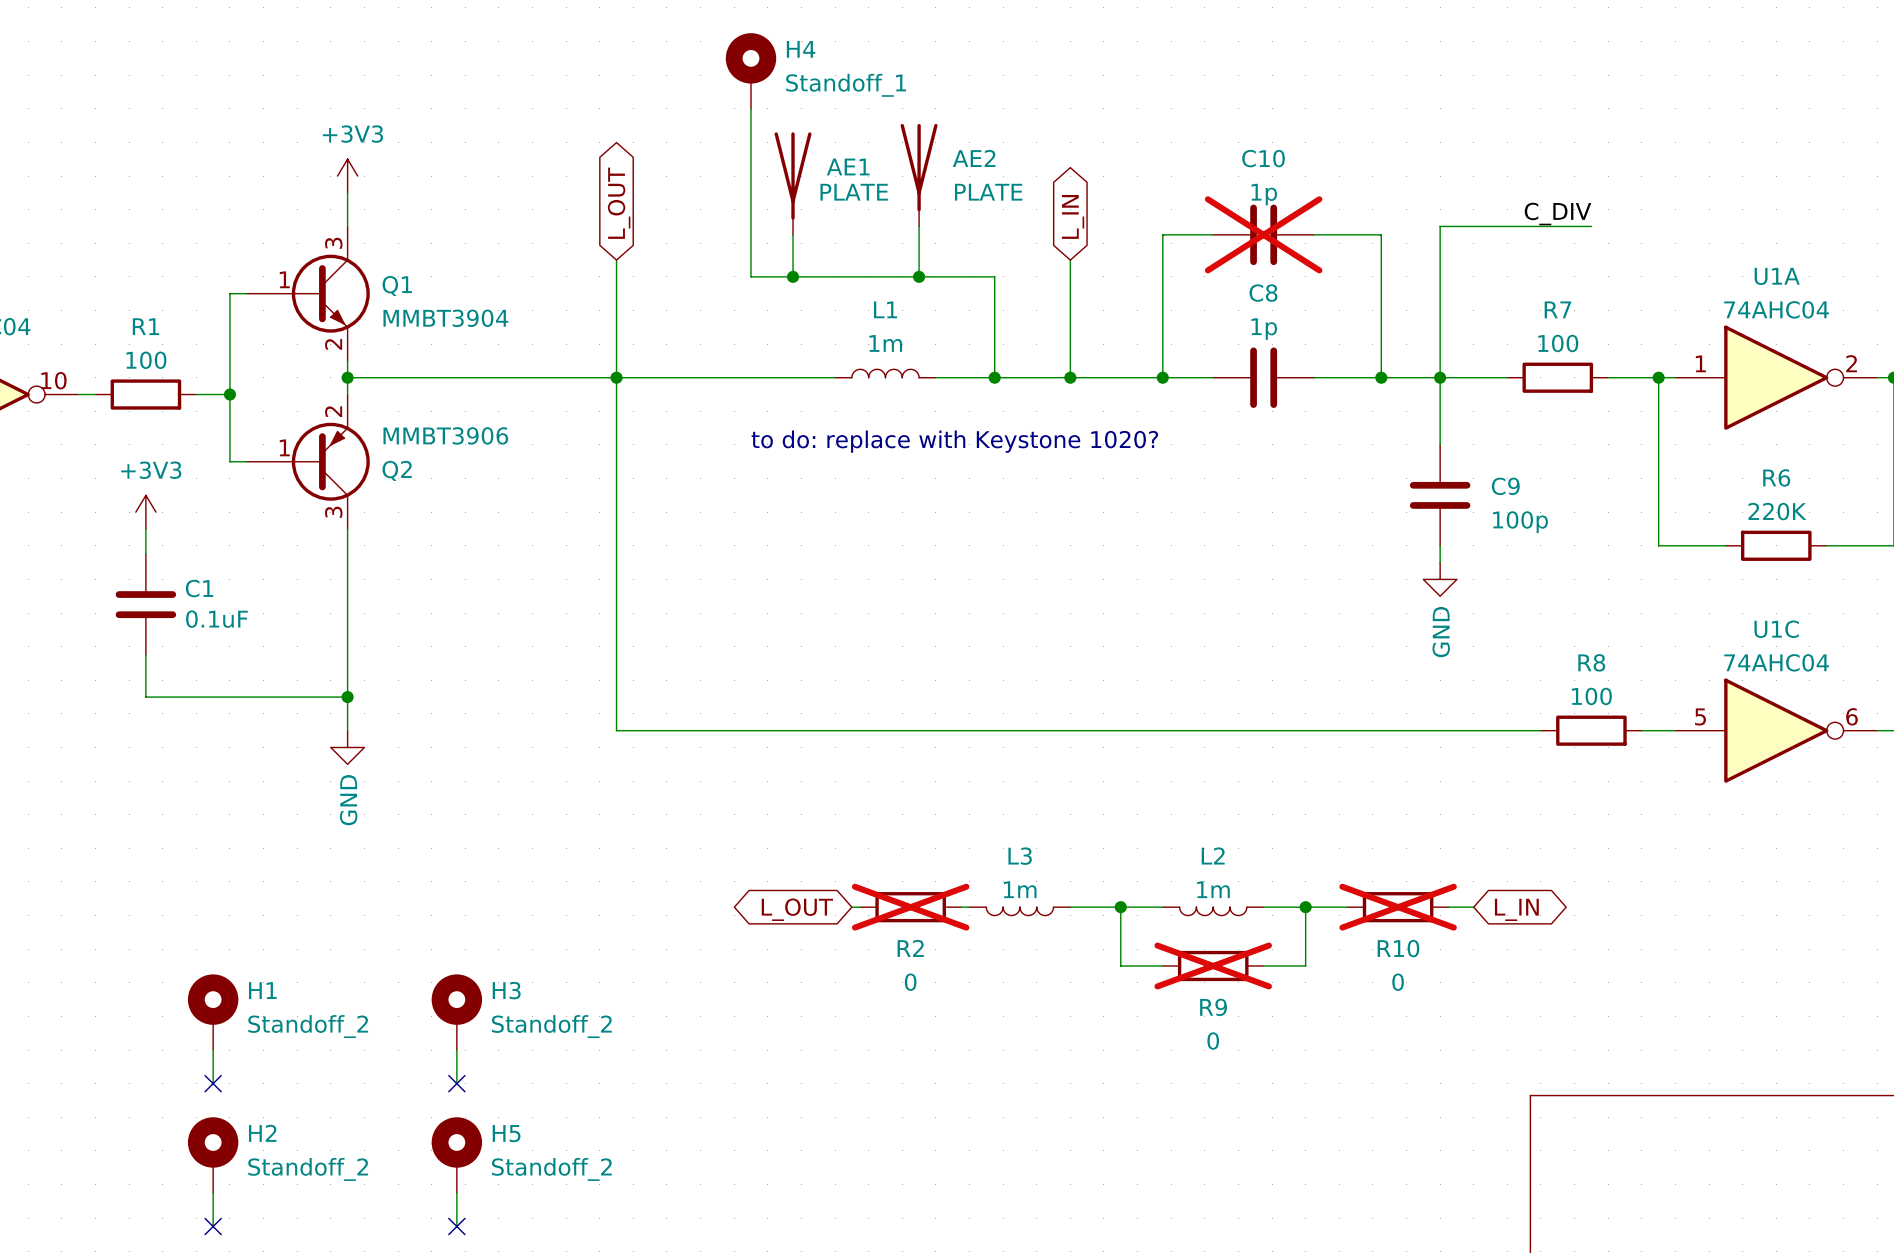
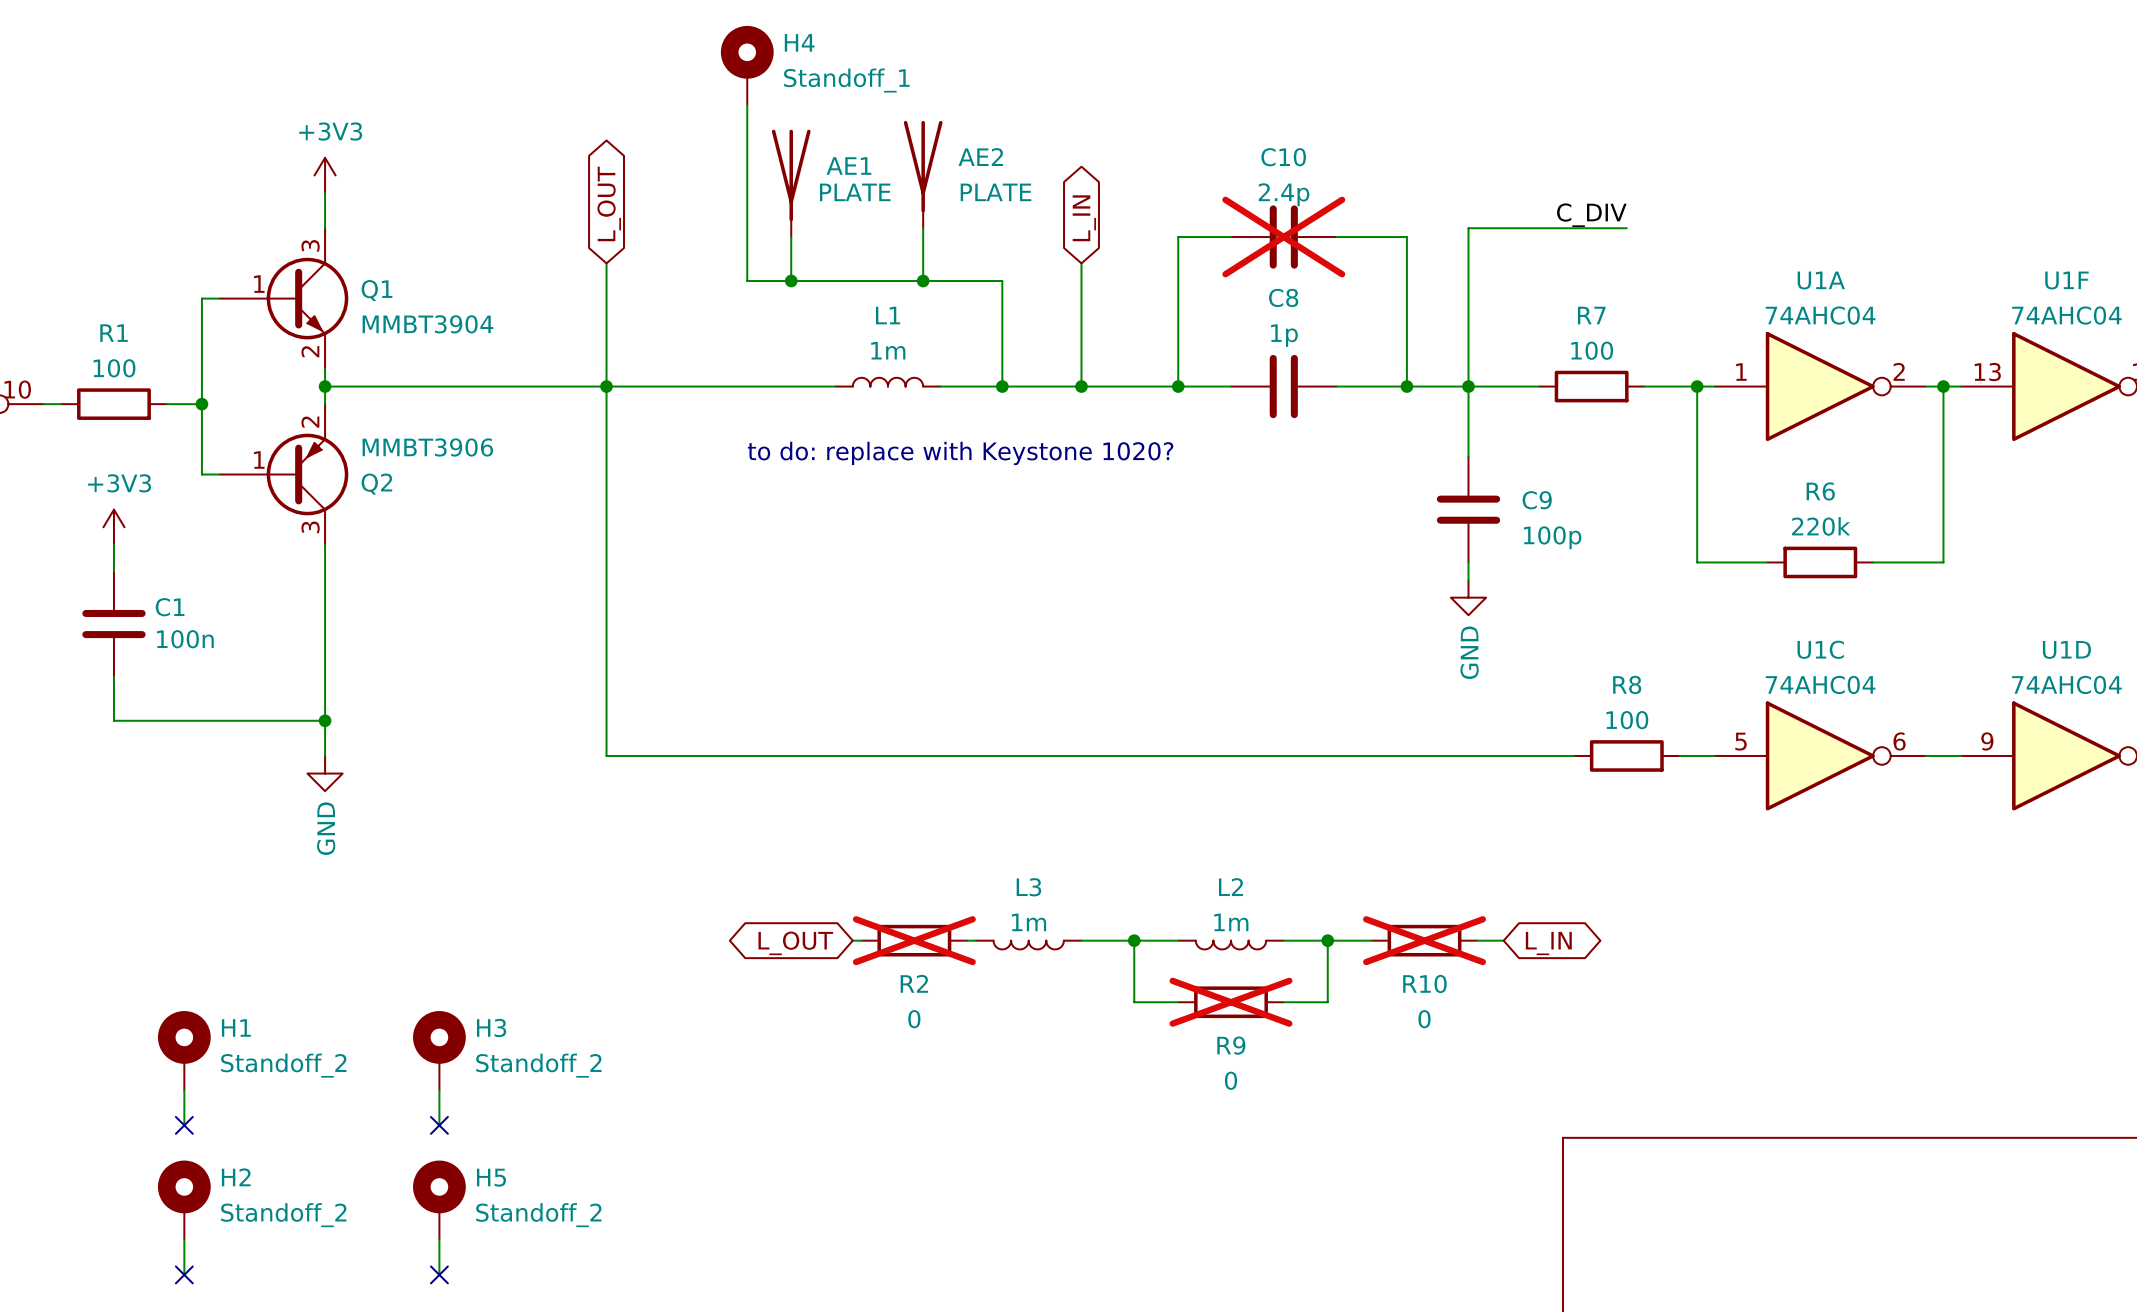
C10 value: 1p (1264, 194) -> 2.4p (1284, 194)
R6 value: 220K (1777, 511) -> 220k (1821, 526)
C1 value: 0.1uF (216, 619) -> 100n (185, 639)

